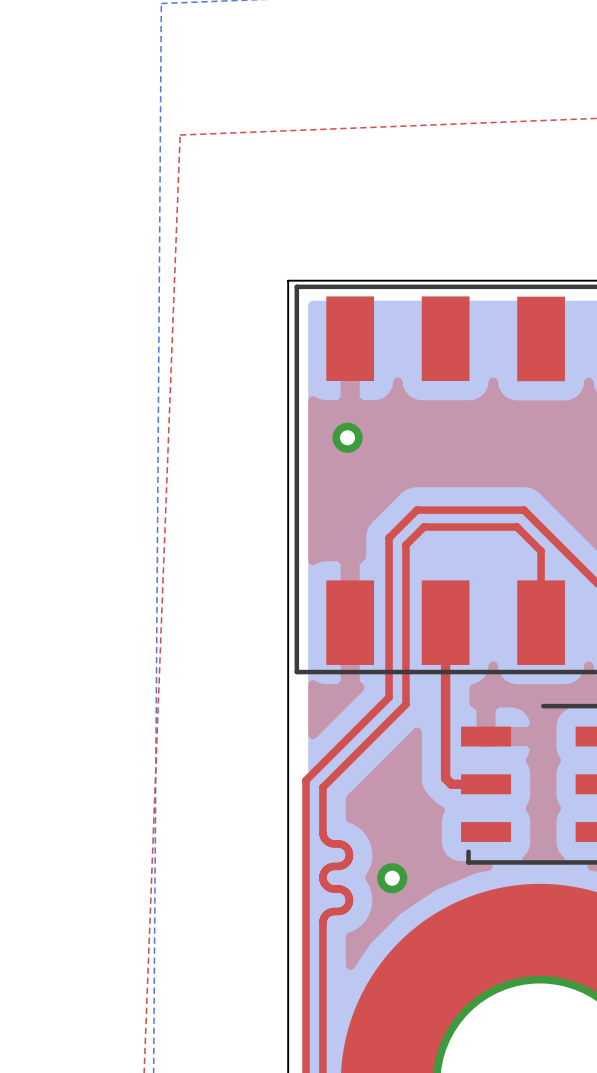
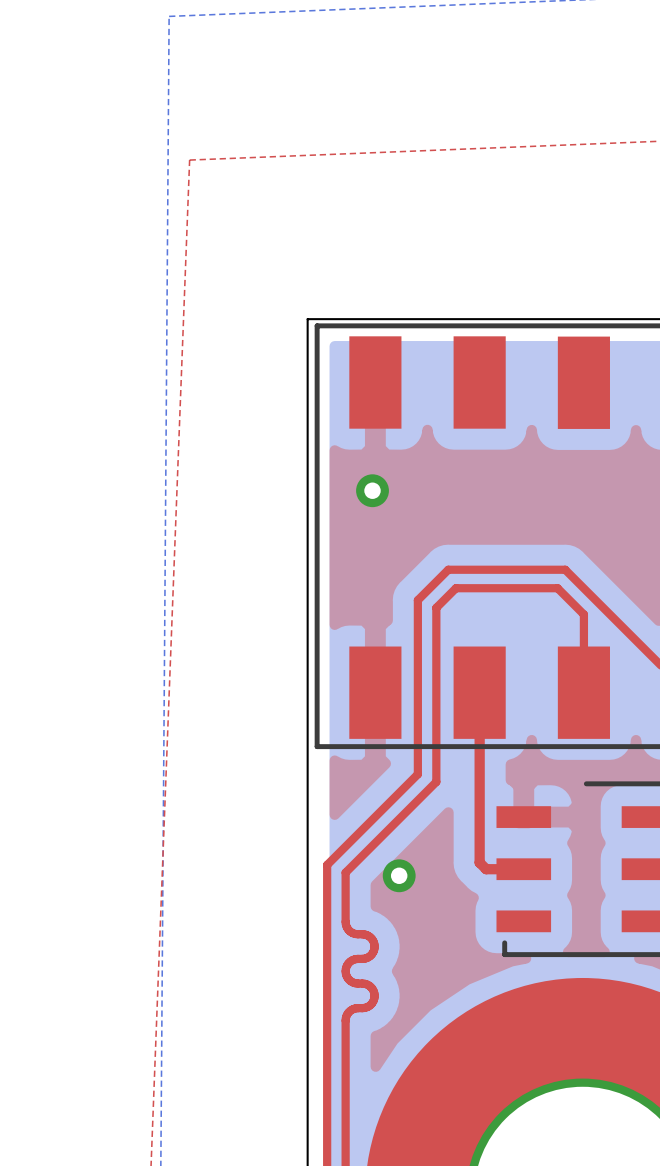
via position: (392, 878) -> (399, 875)

